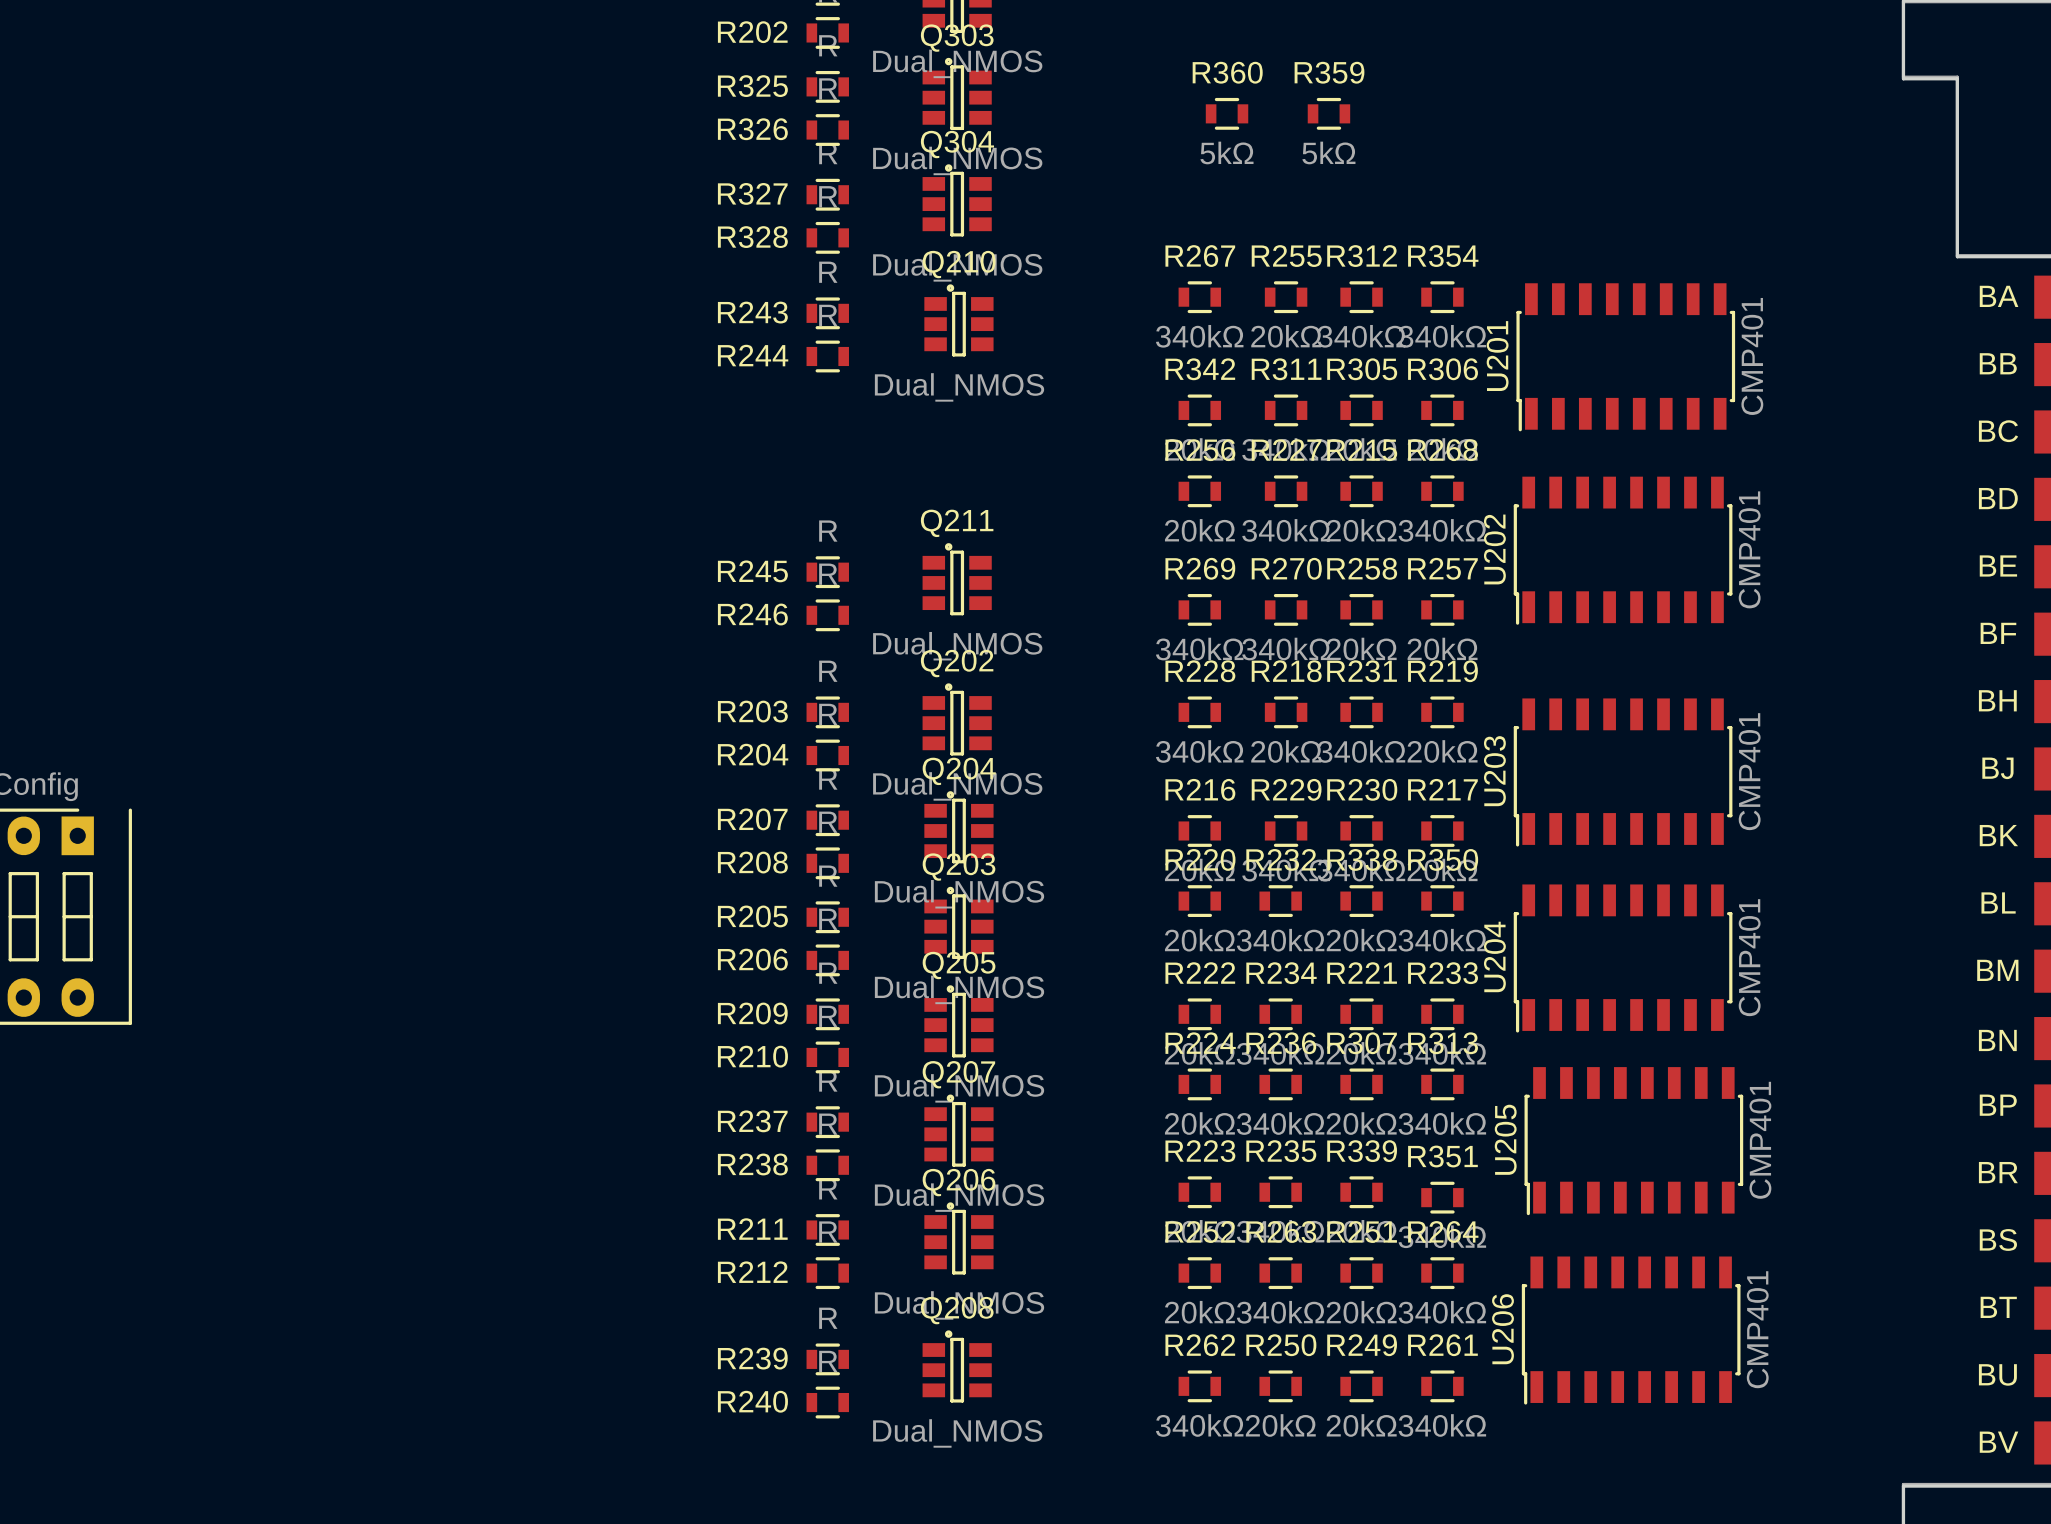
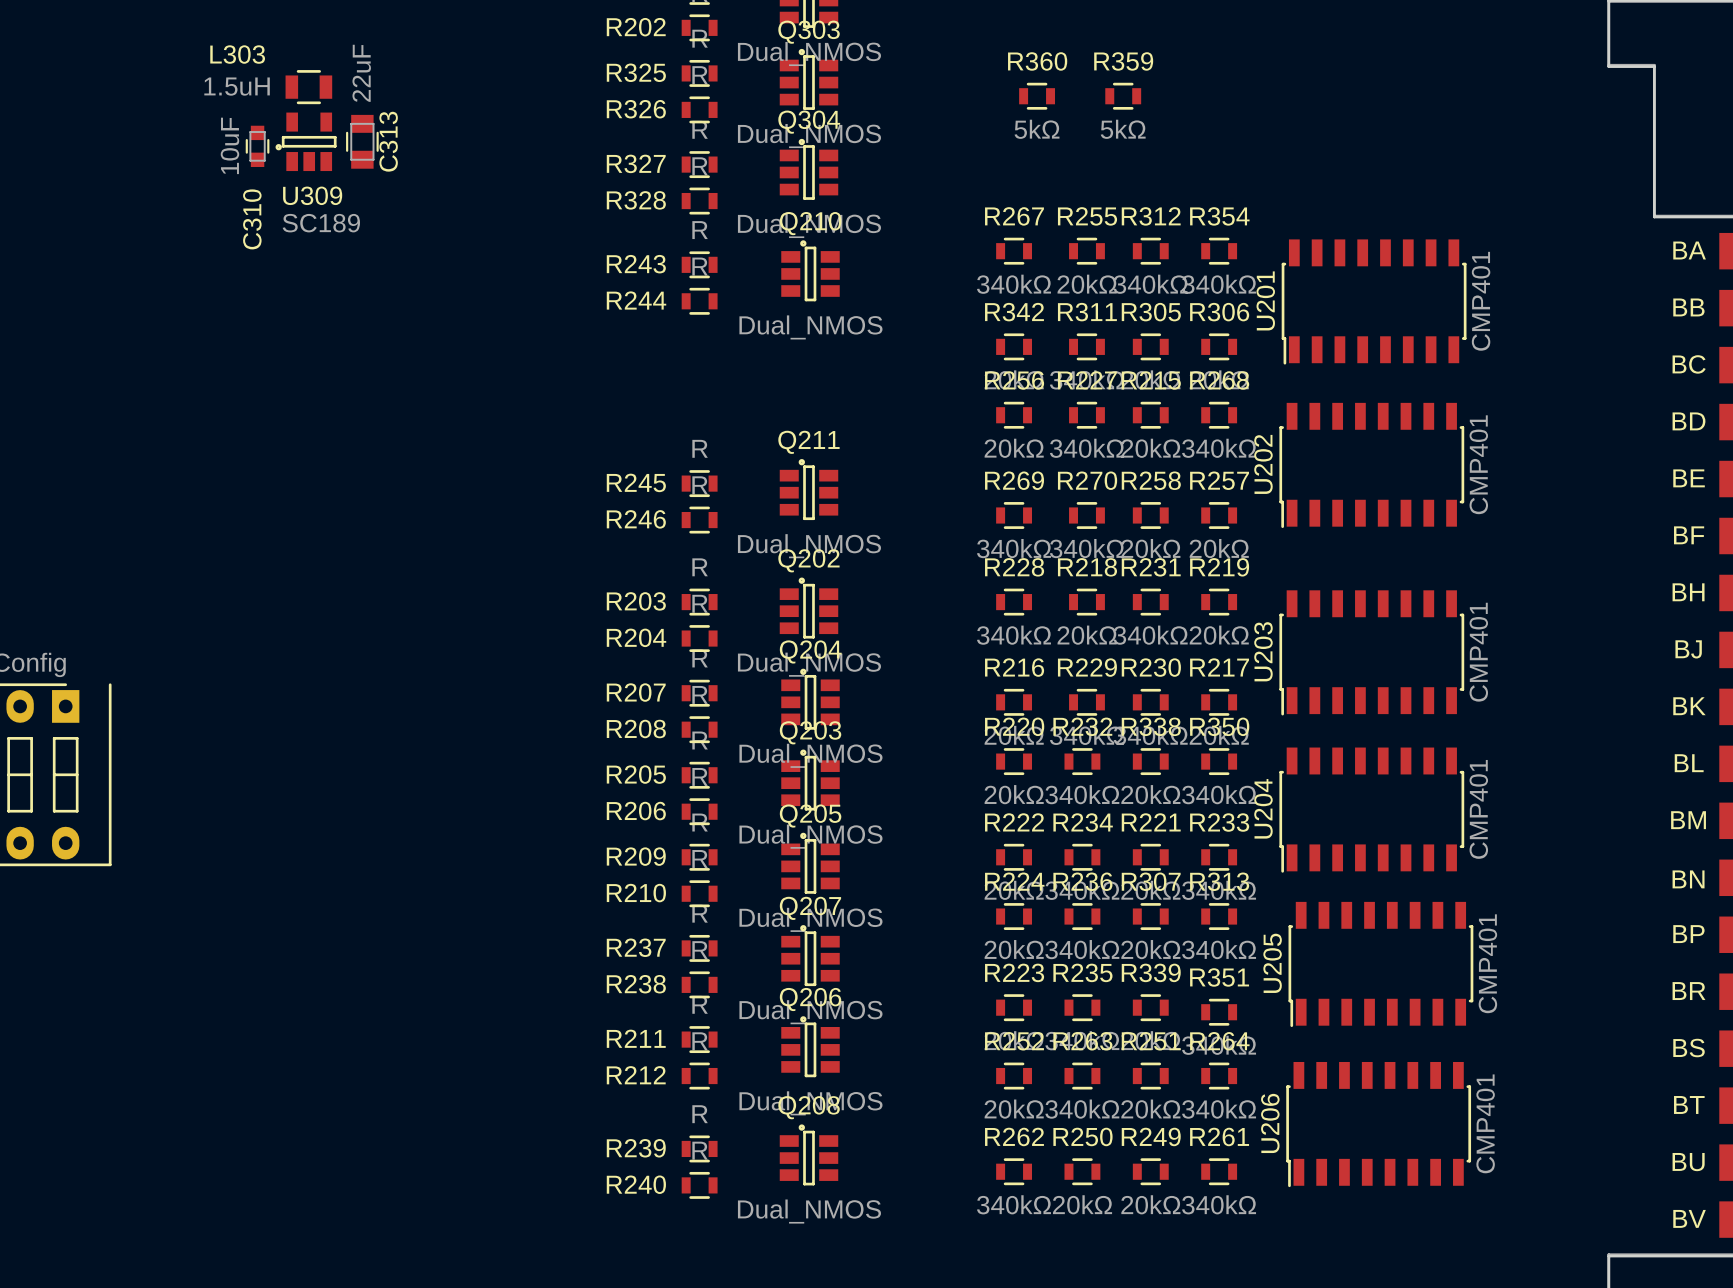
L303: none -> 1.5uH (308, 87)
U309: none -> SC189 (306, 141)
C313: none -> 22uF (362, 141)
C310: none -> 10uF (257, 146)

